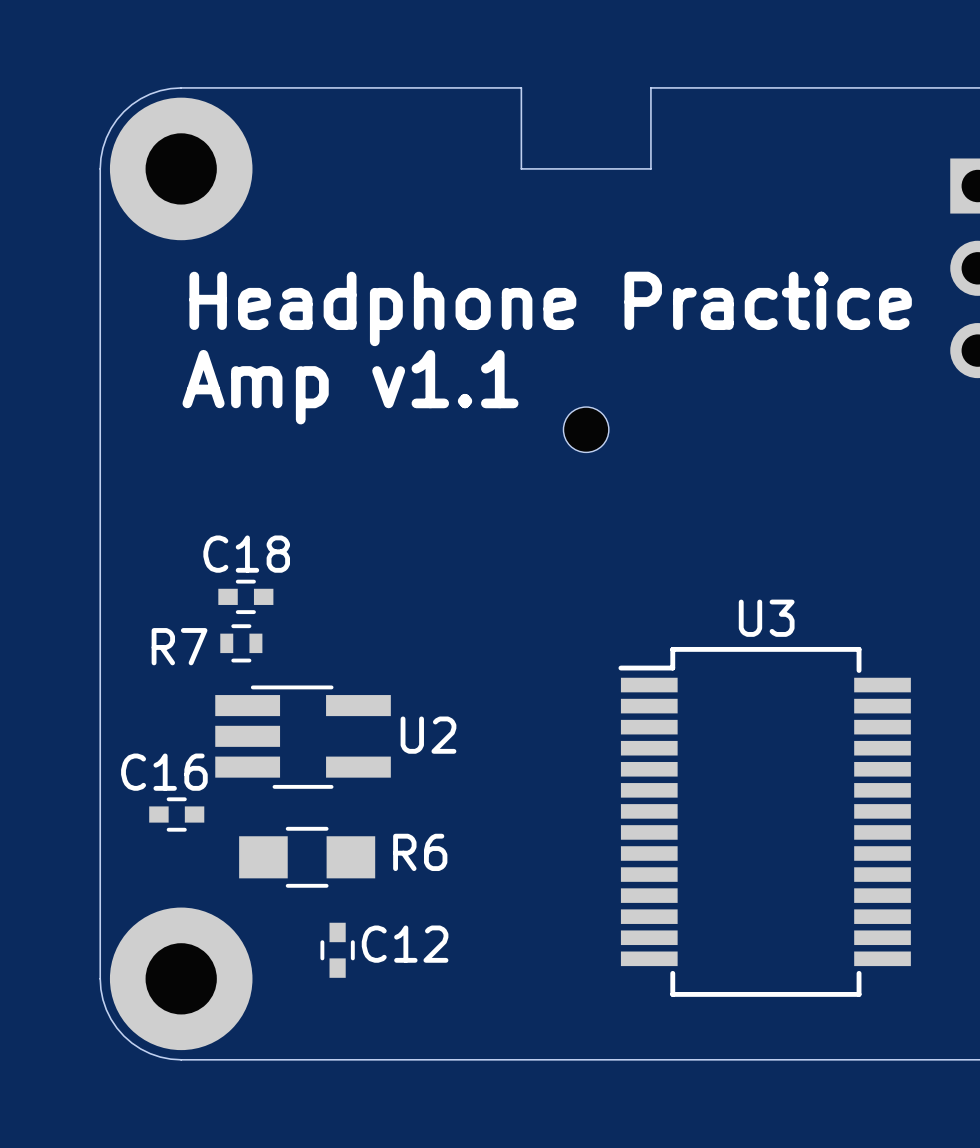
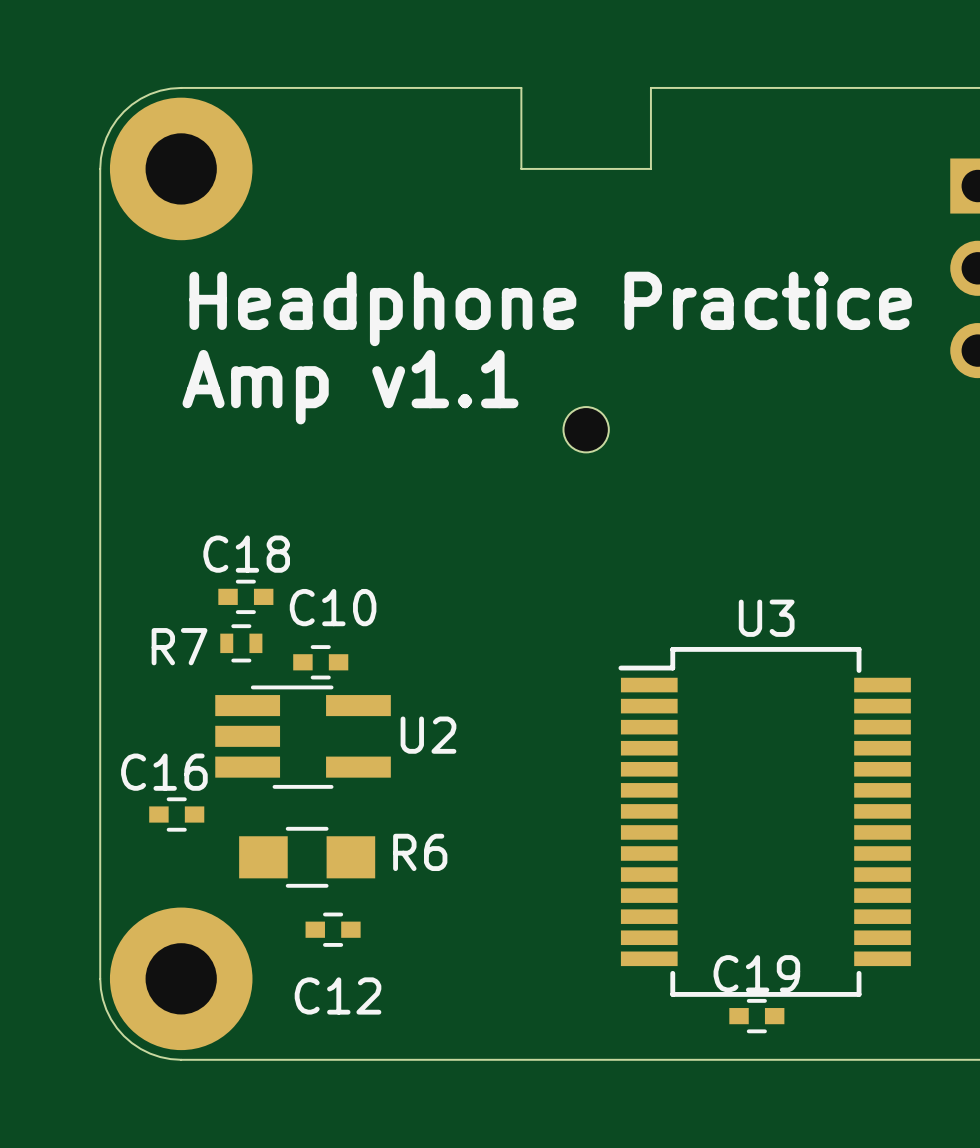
C10: none -> (320, 662)
C12 rotation: 0° (337, 950) -> 90° clockwise (333, 929)
C19: none -> (756, 1016)

